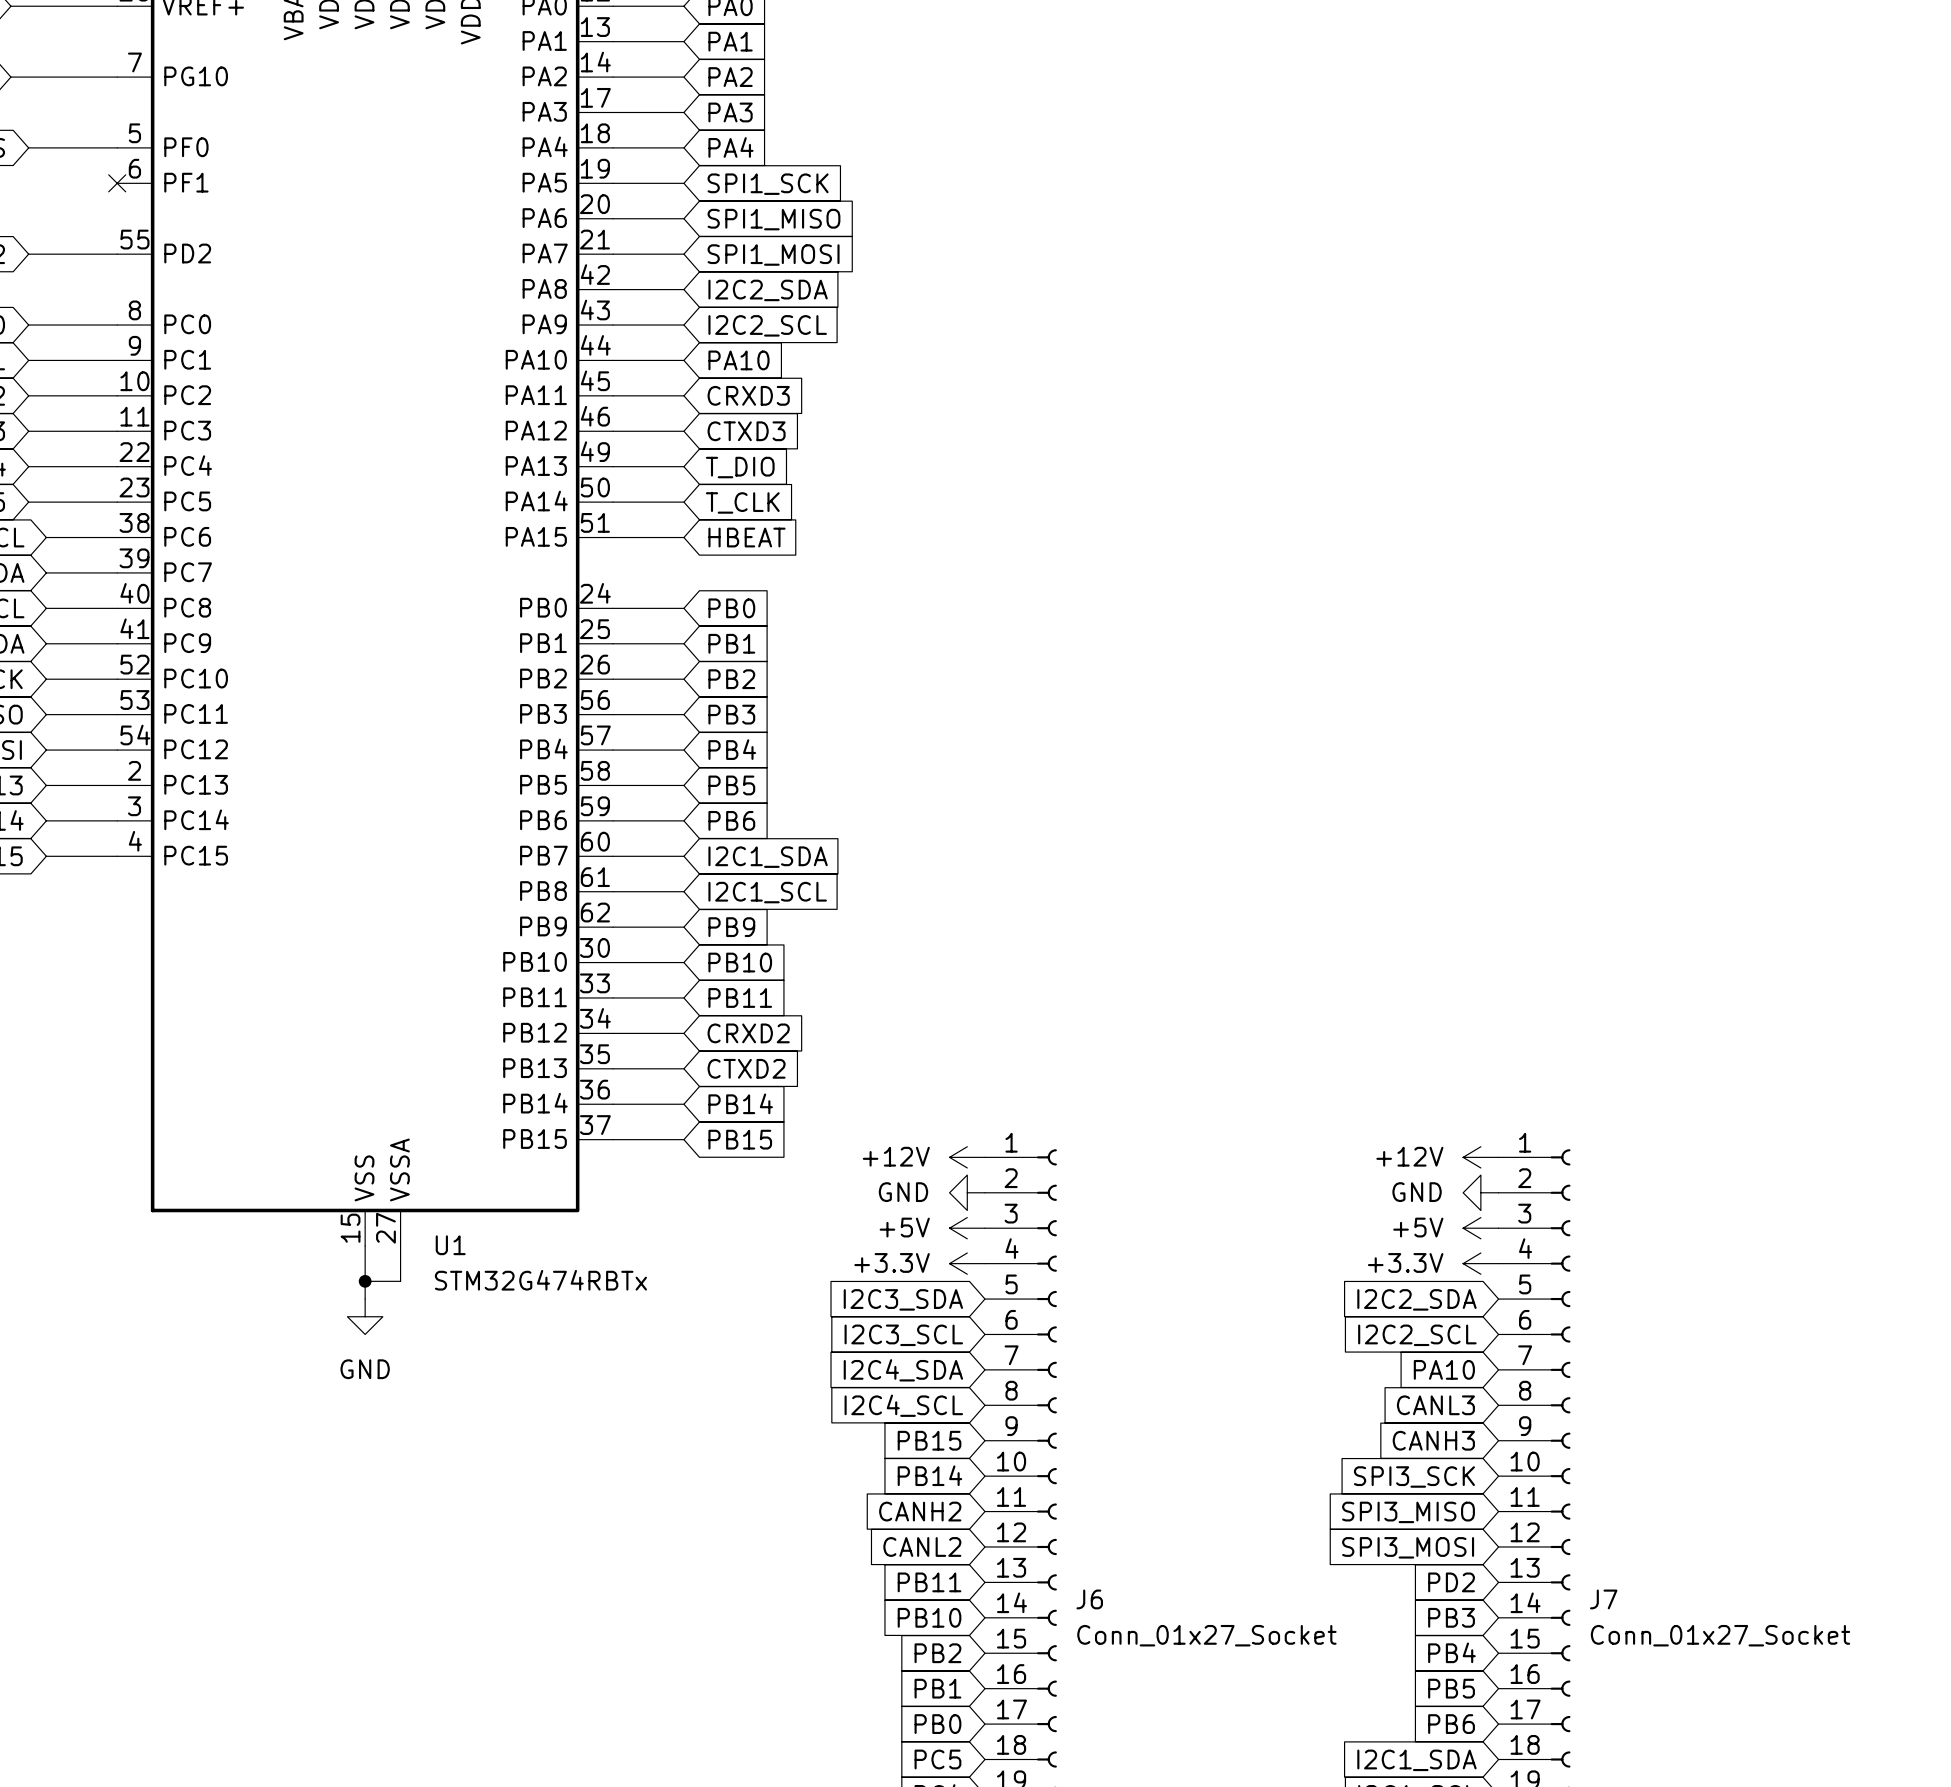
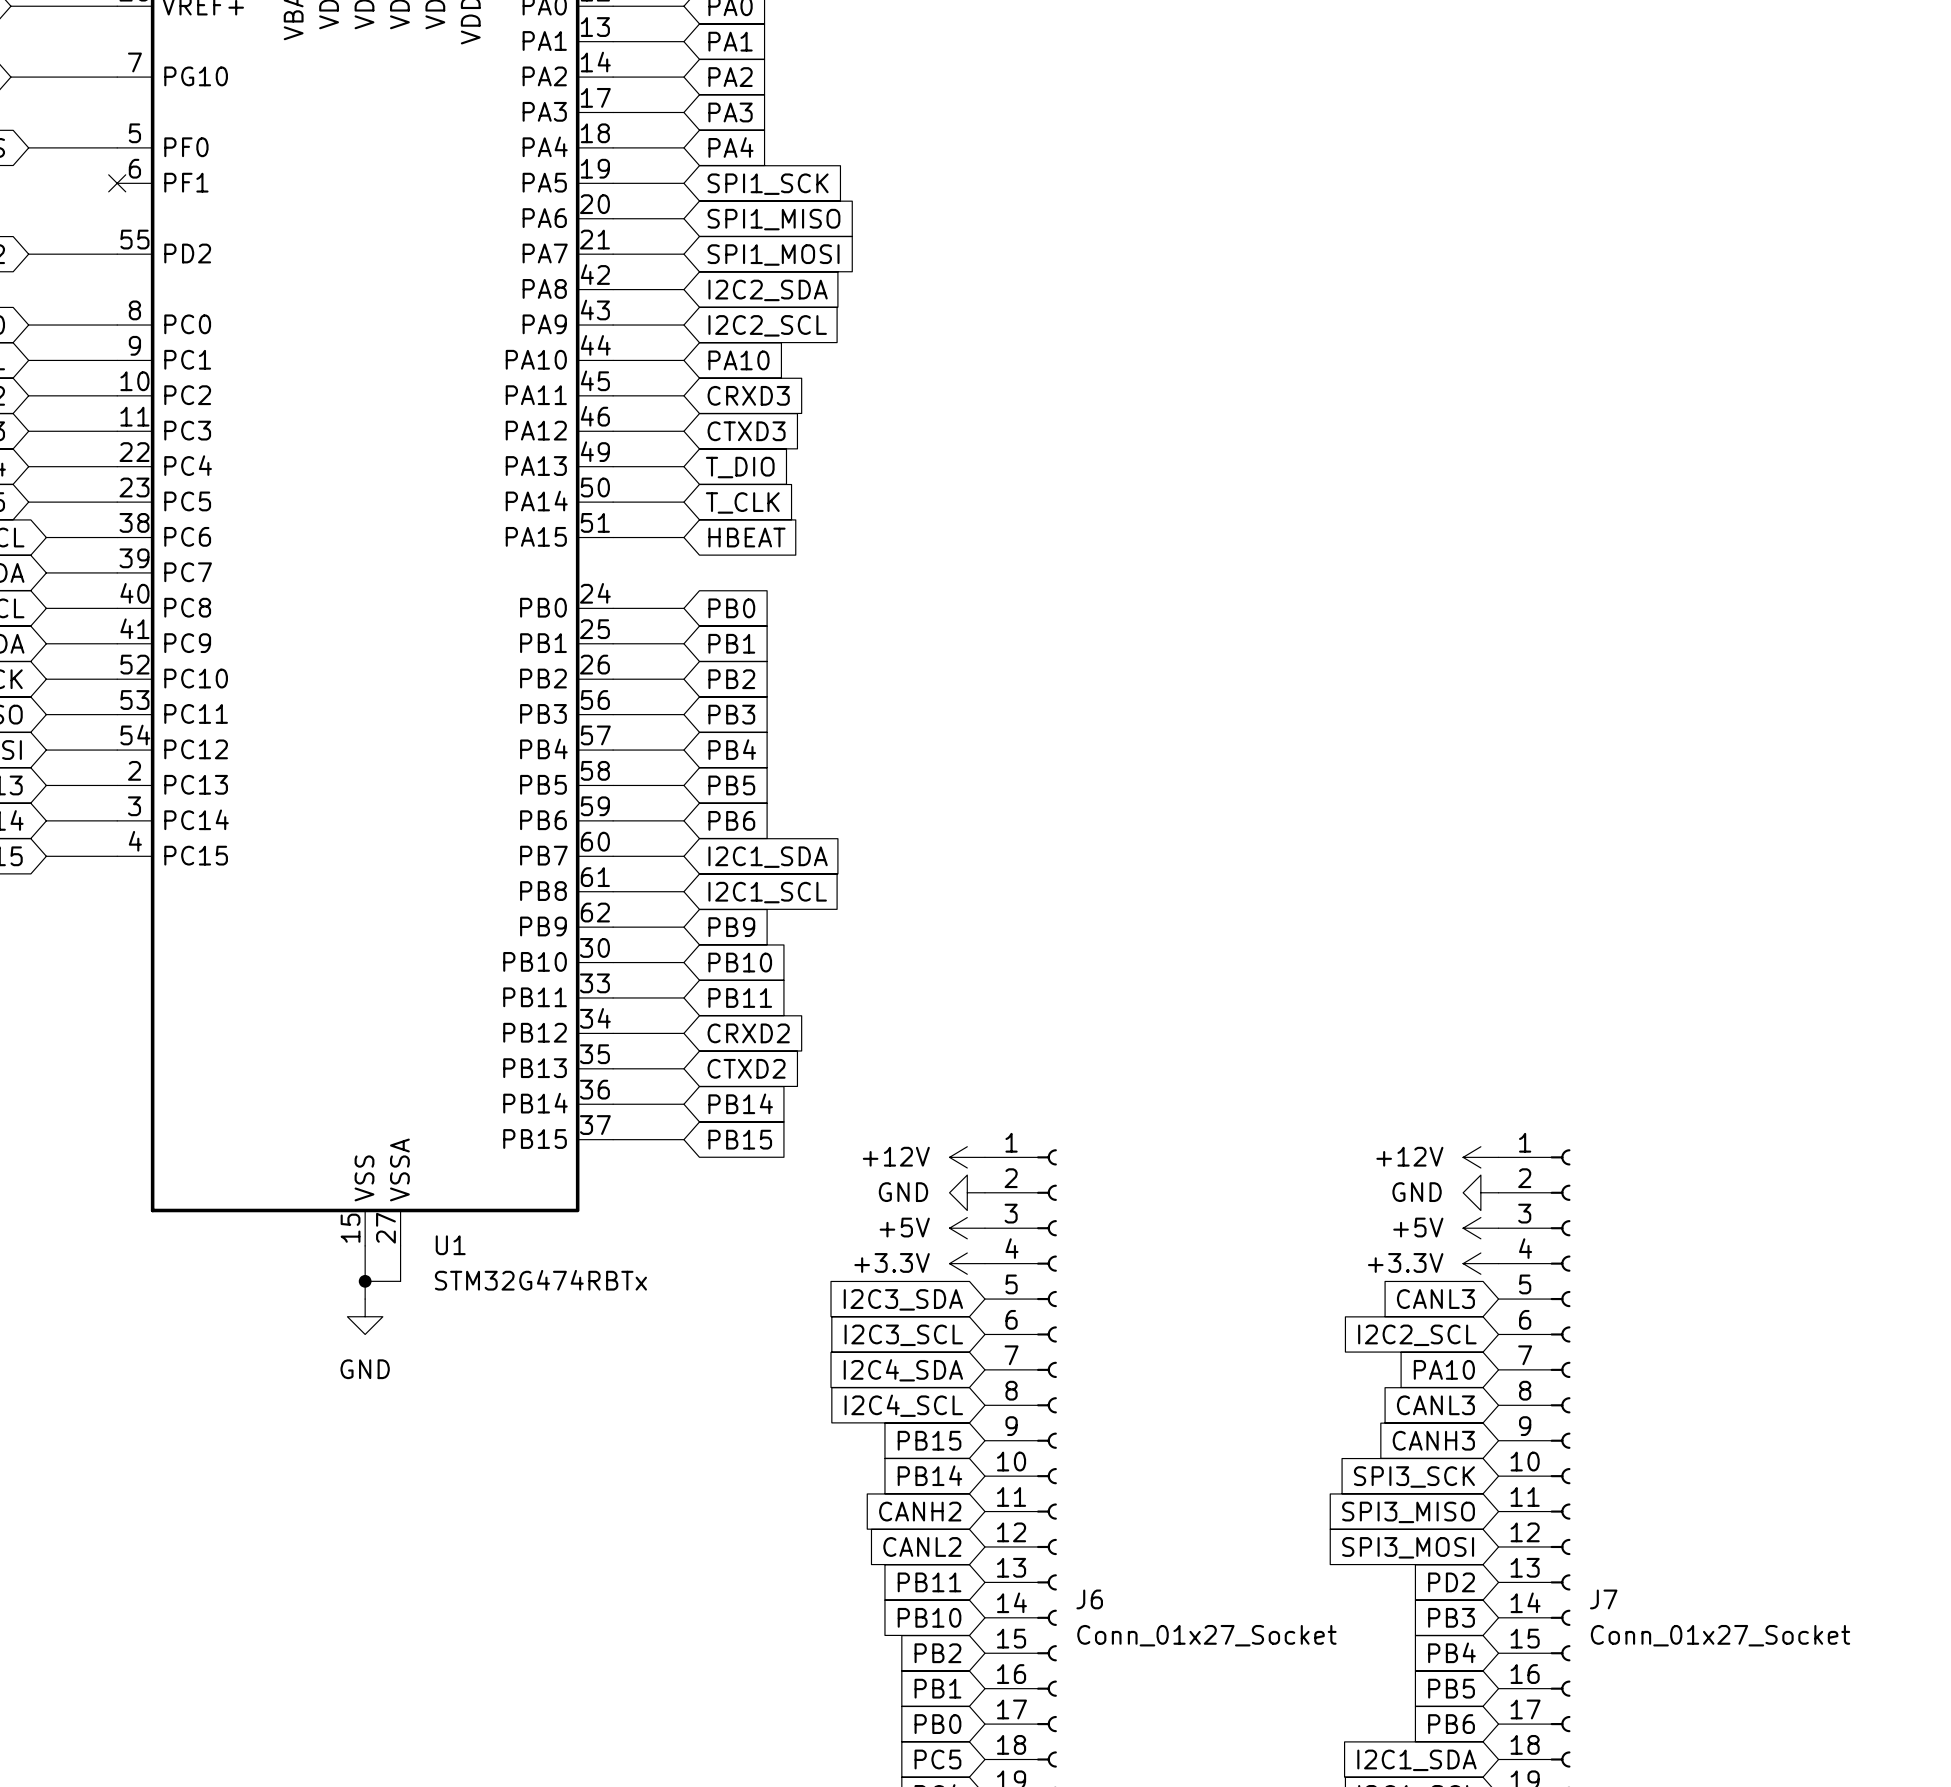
global label: I2C2_SDA (1416, 1299) -> CANL3 (1435, 1299)

